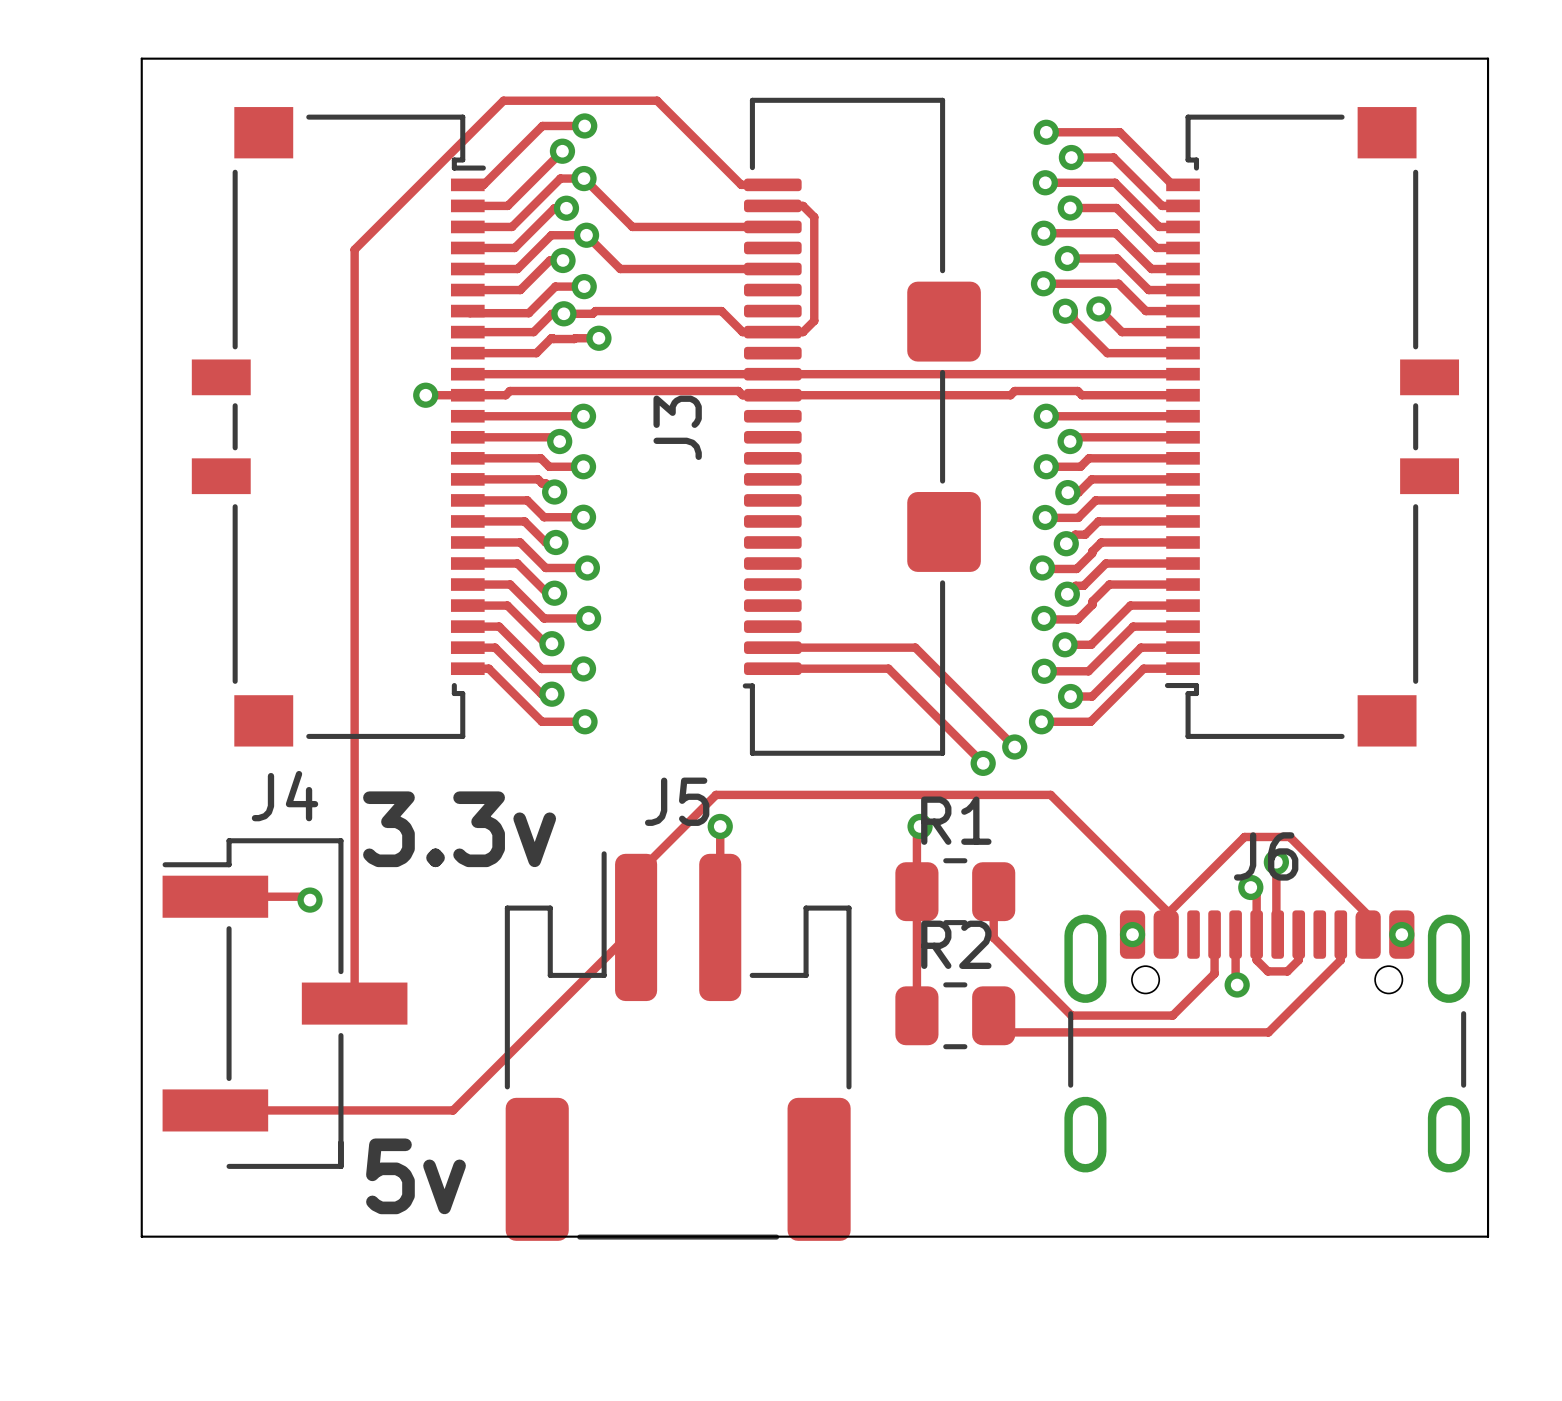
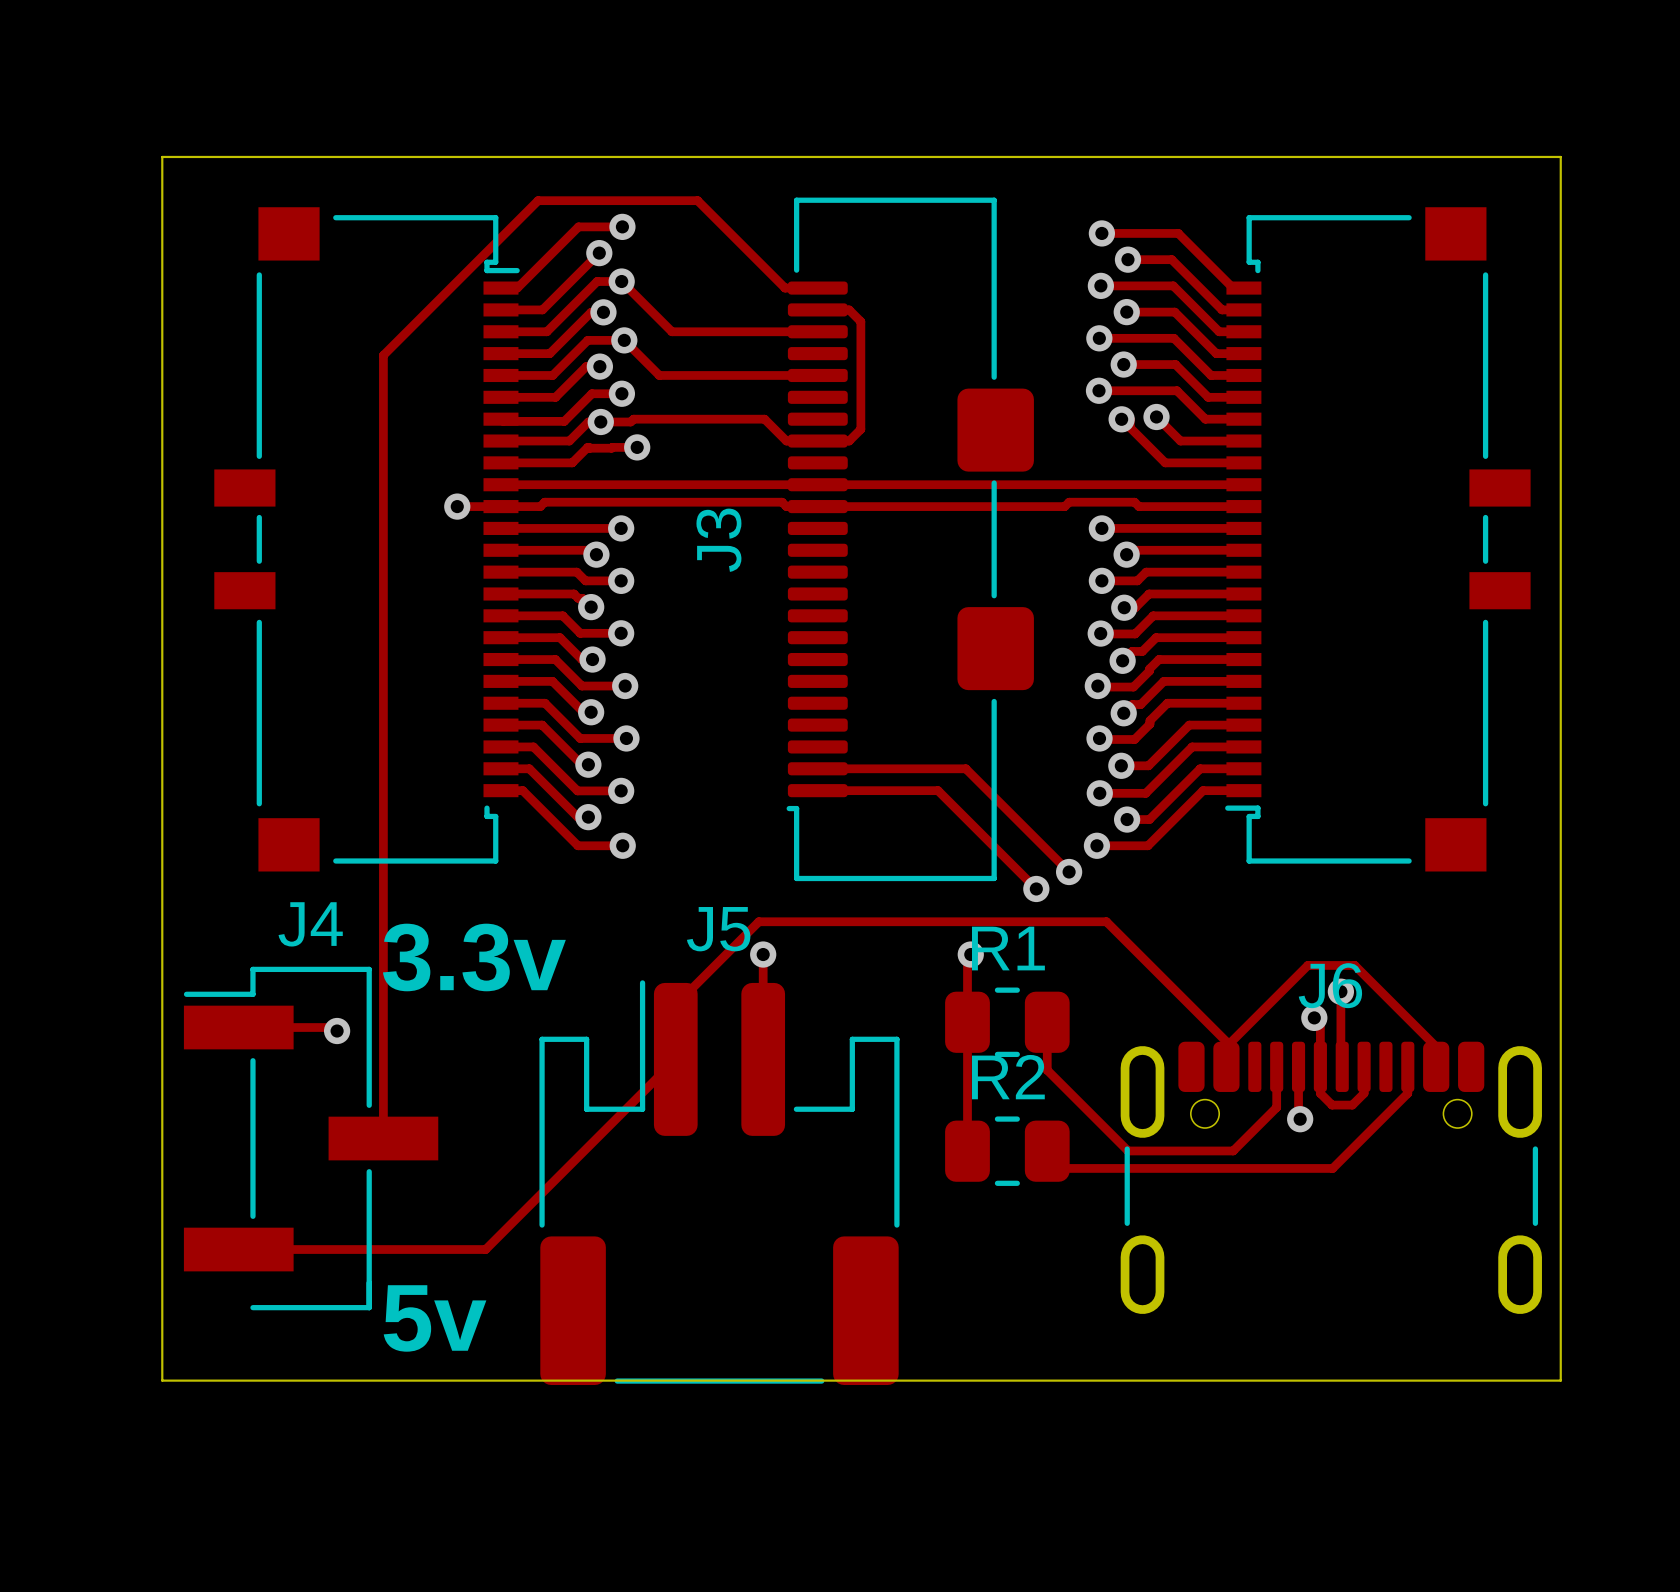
via: (1132, 934) -> none
via: (1401, 934) -> none

